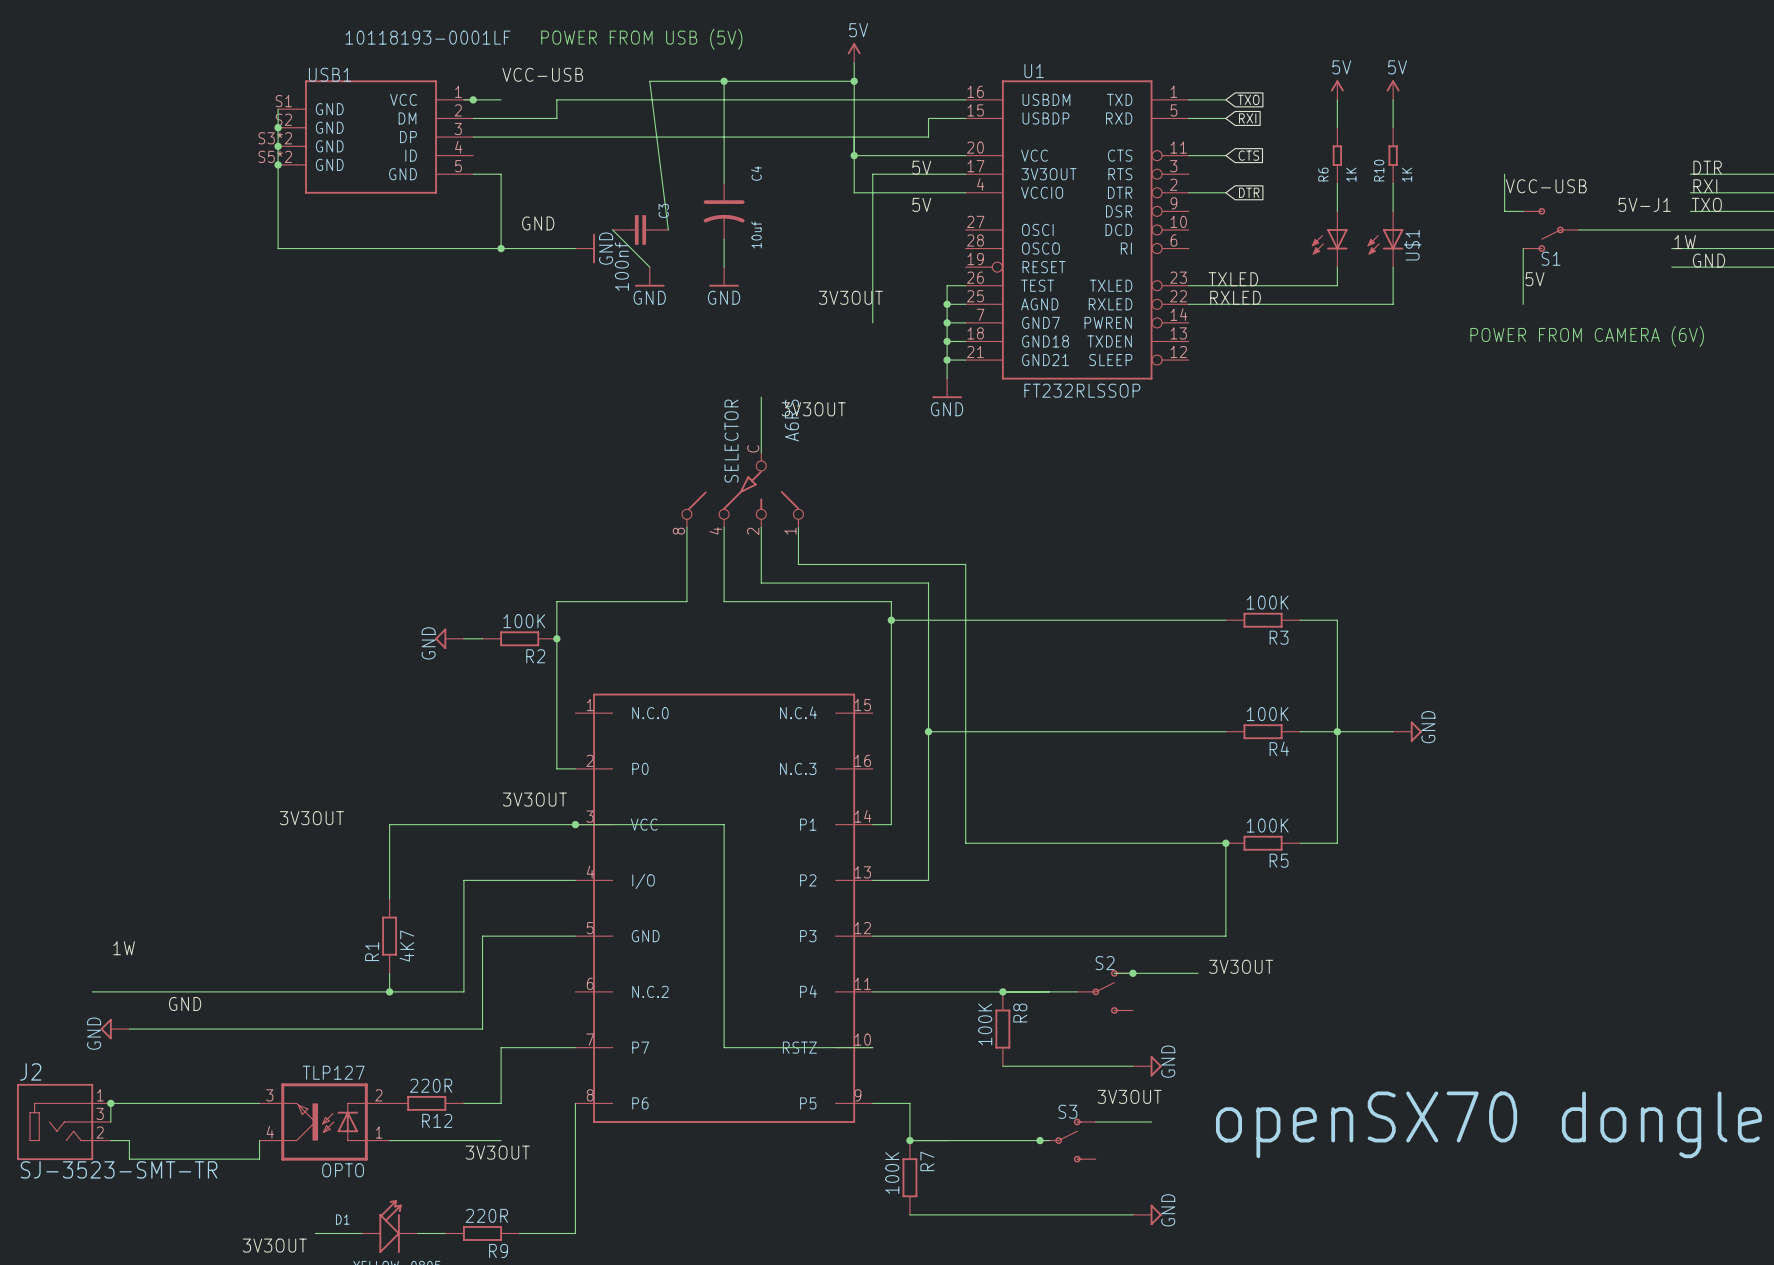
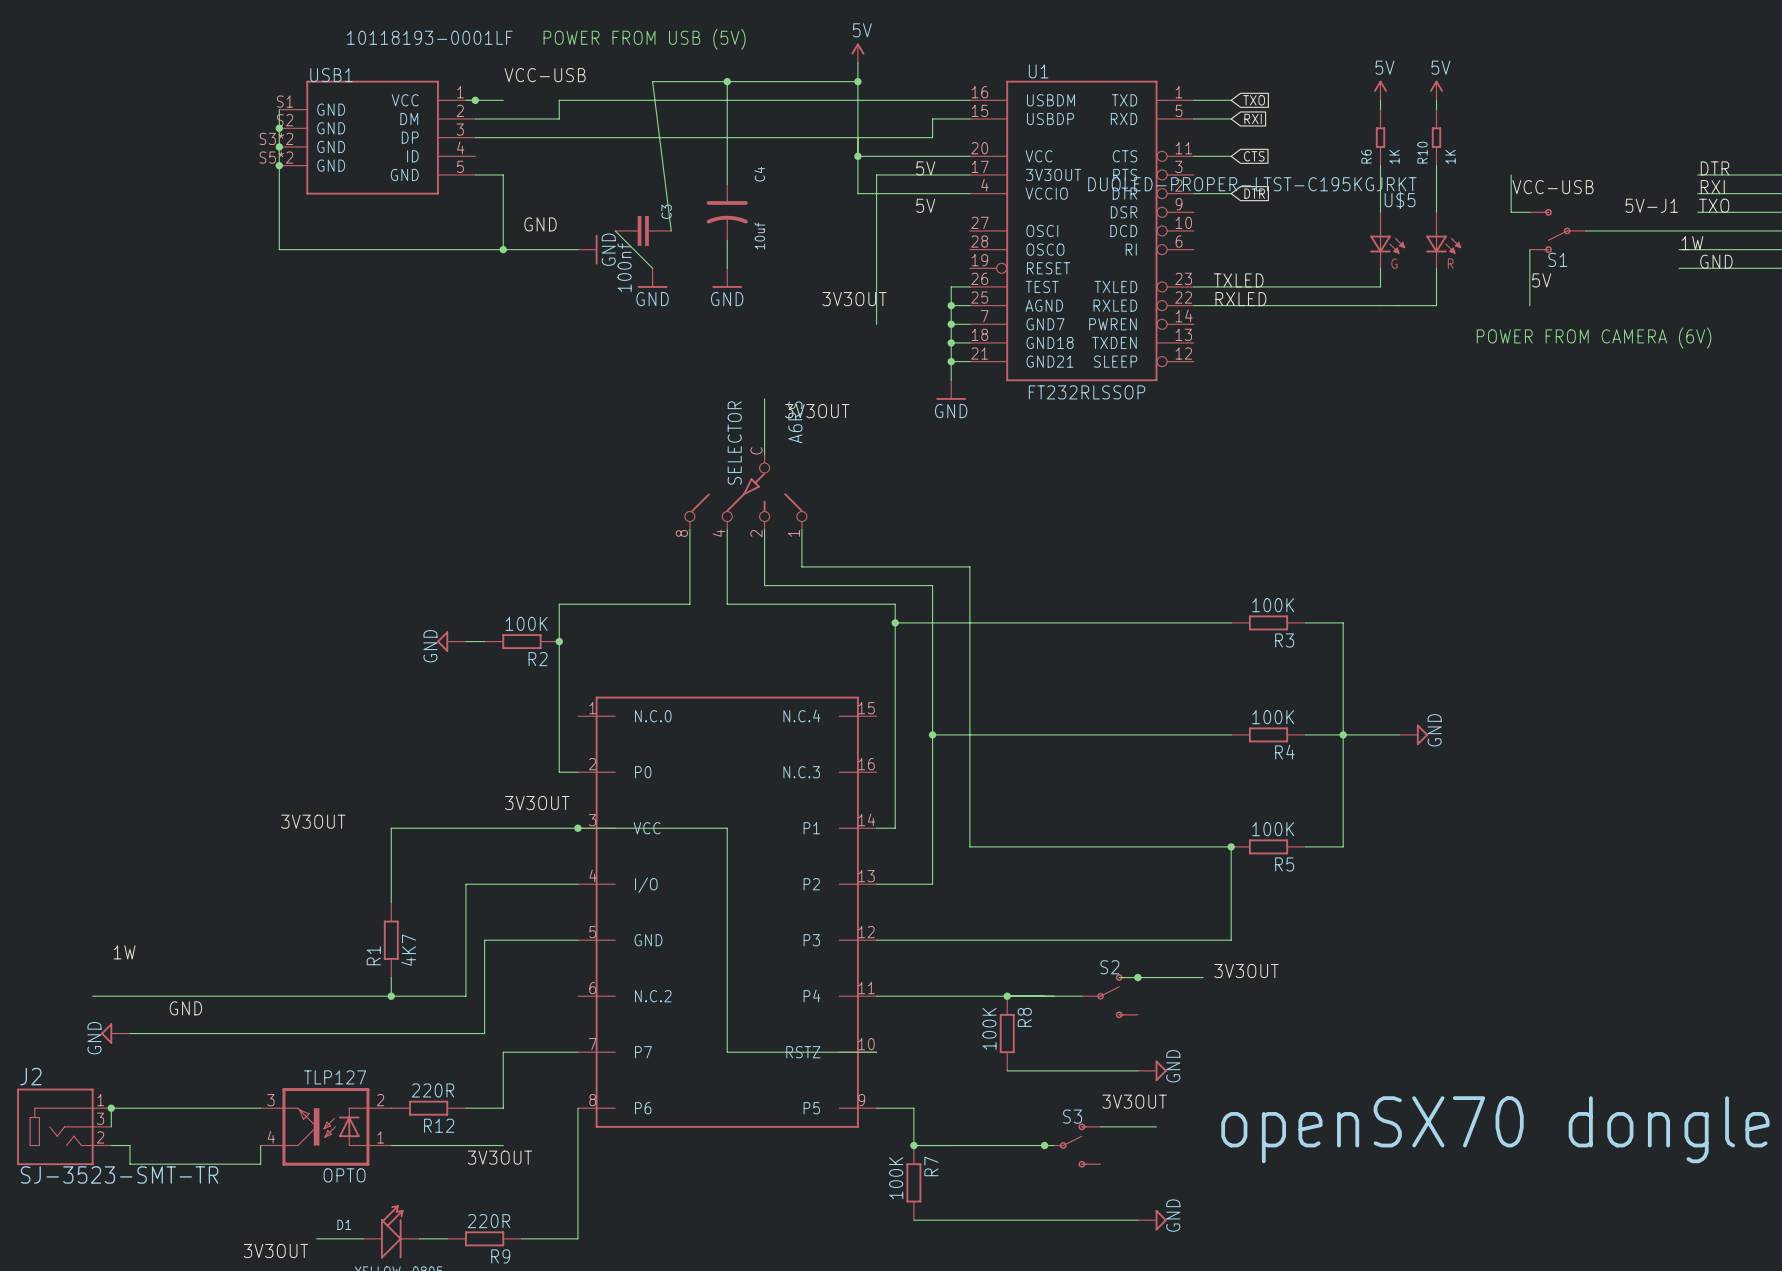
power symbol: 5V (1337, 90) -> none
power symbol: none -> 5V (1380, 90)
power symbol: 5V (1393, 90) -> none
power symbol: none -> 5V (1436, 90)
wire: (1337, 99) (1337, 127) -> none
wire: none -> (1380, 100) (1380, 109)
wire: (1393, 99) (1393, 127) -> none
wire: none -> (1436, 100) (1436, 109)
R6 position: (1337, 155) -> (1380, 137)
R10 position: (1393, 155) -> (1436, 137)
wire: none -> (1380, 165) (1380, 212)
wire: none -> (1436, 165) (1436, 212)
wire: (1337, 183) (1337, 211) -> none
wire: (1393, 183) (1393, 211) -> none
U$1: (1357, 239) -> none
U$5: none -> DUOLED-PROPER-LTST-C195KGJRKT (1415, 240)
wire: (1337, 267) (1337, 285) -> (1380, 268) (1380, 286) (1343, 286)
wire: (1393, 267) (1393, 304) -> (1436, 268) (1436, 305) (1399, 305)

